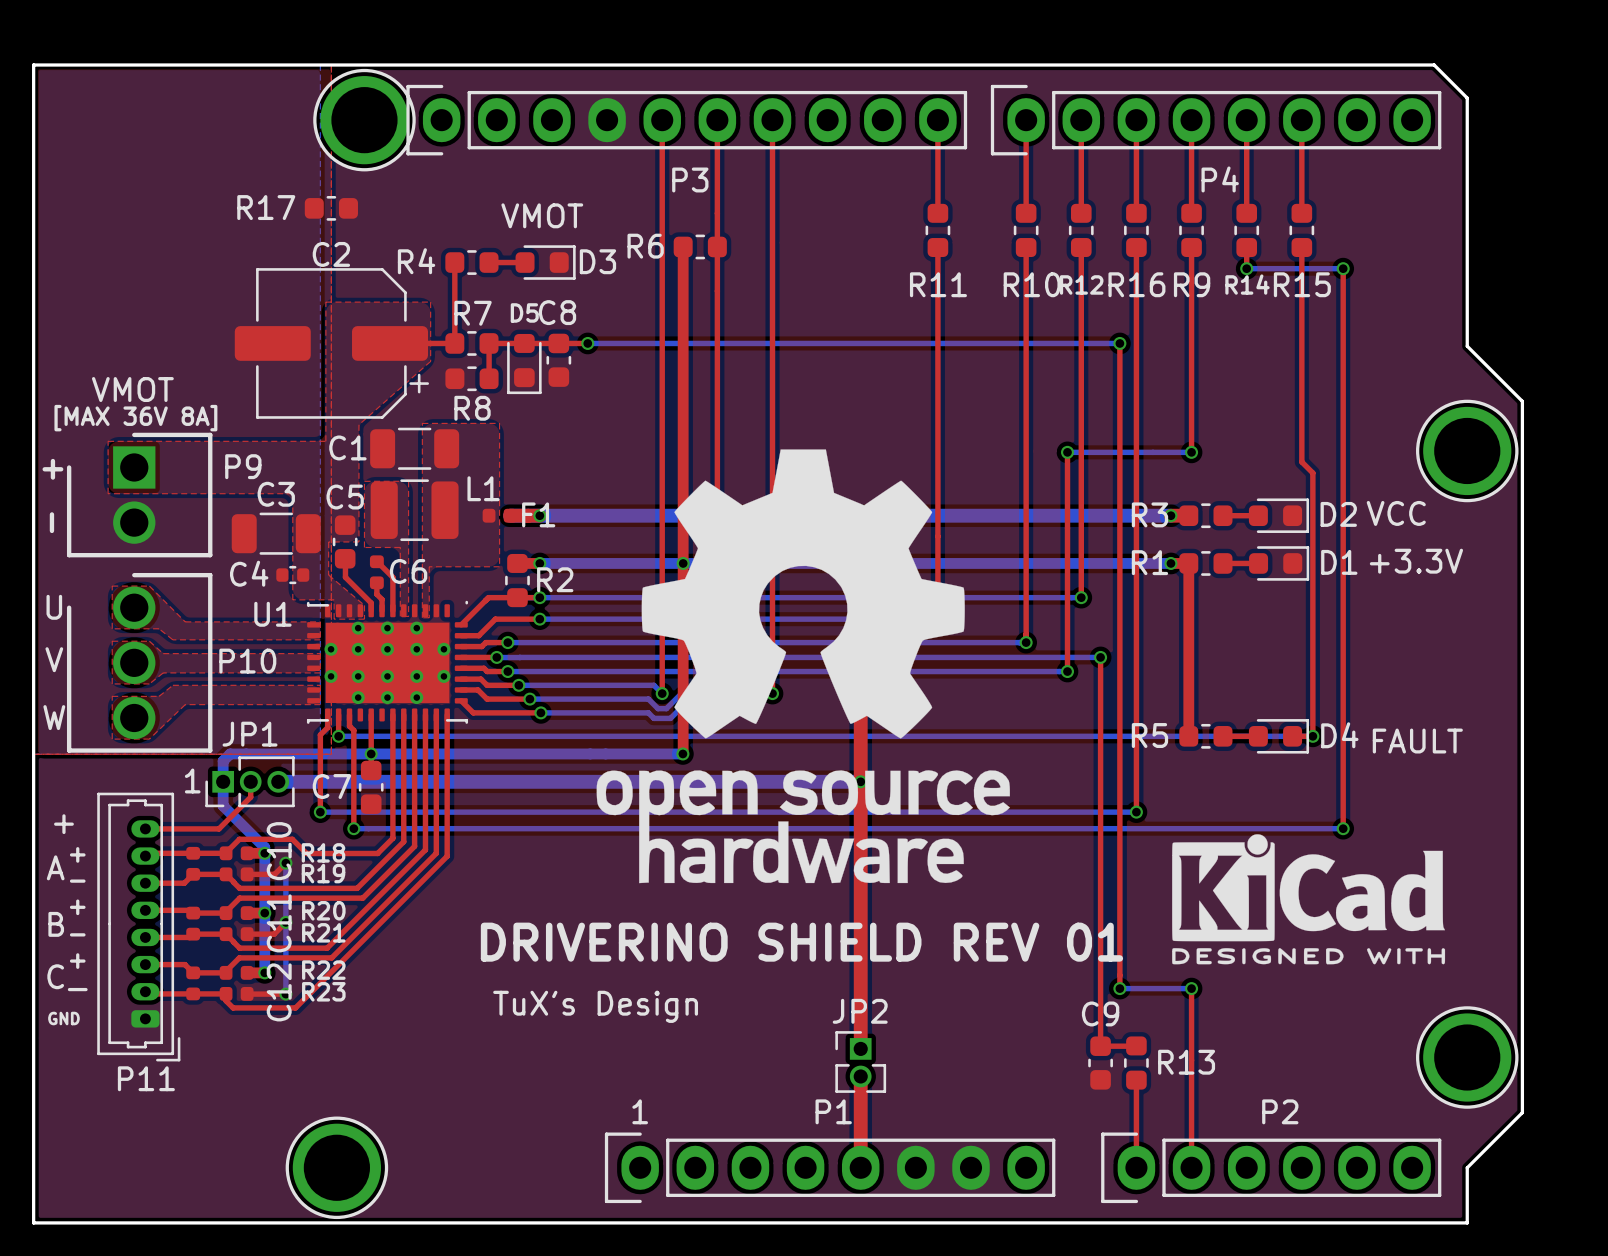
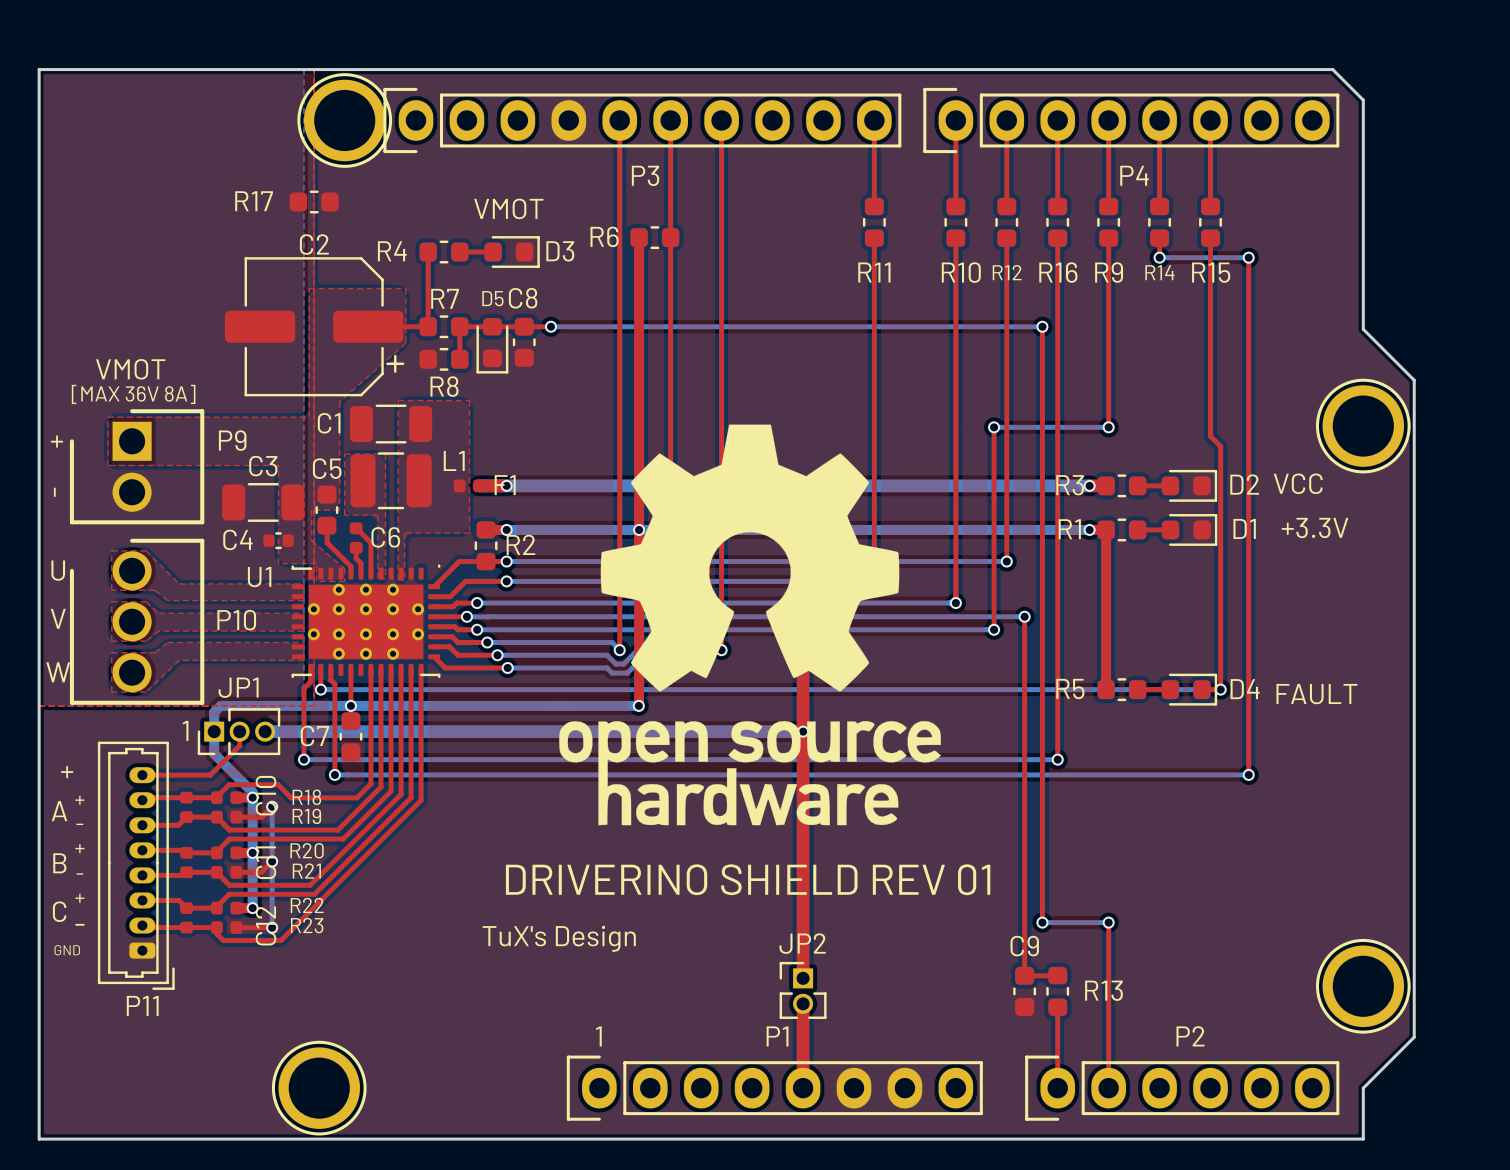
drawing: [1172, 834, 1446, 965] -> none

